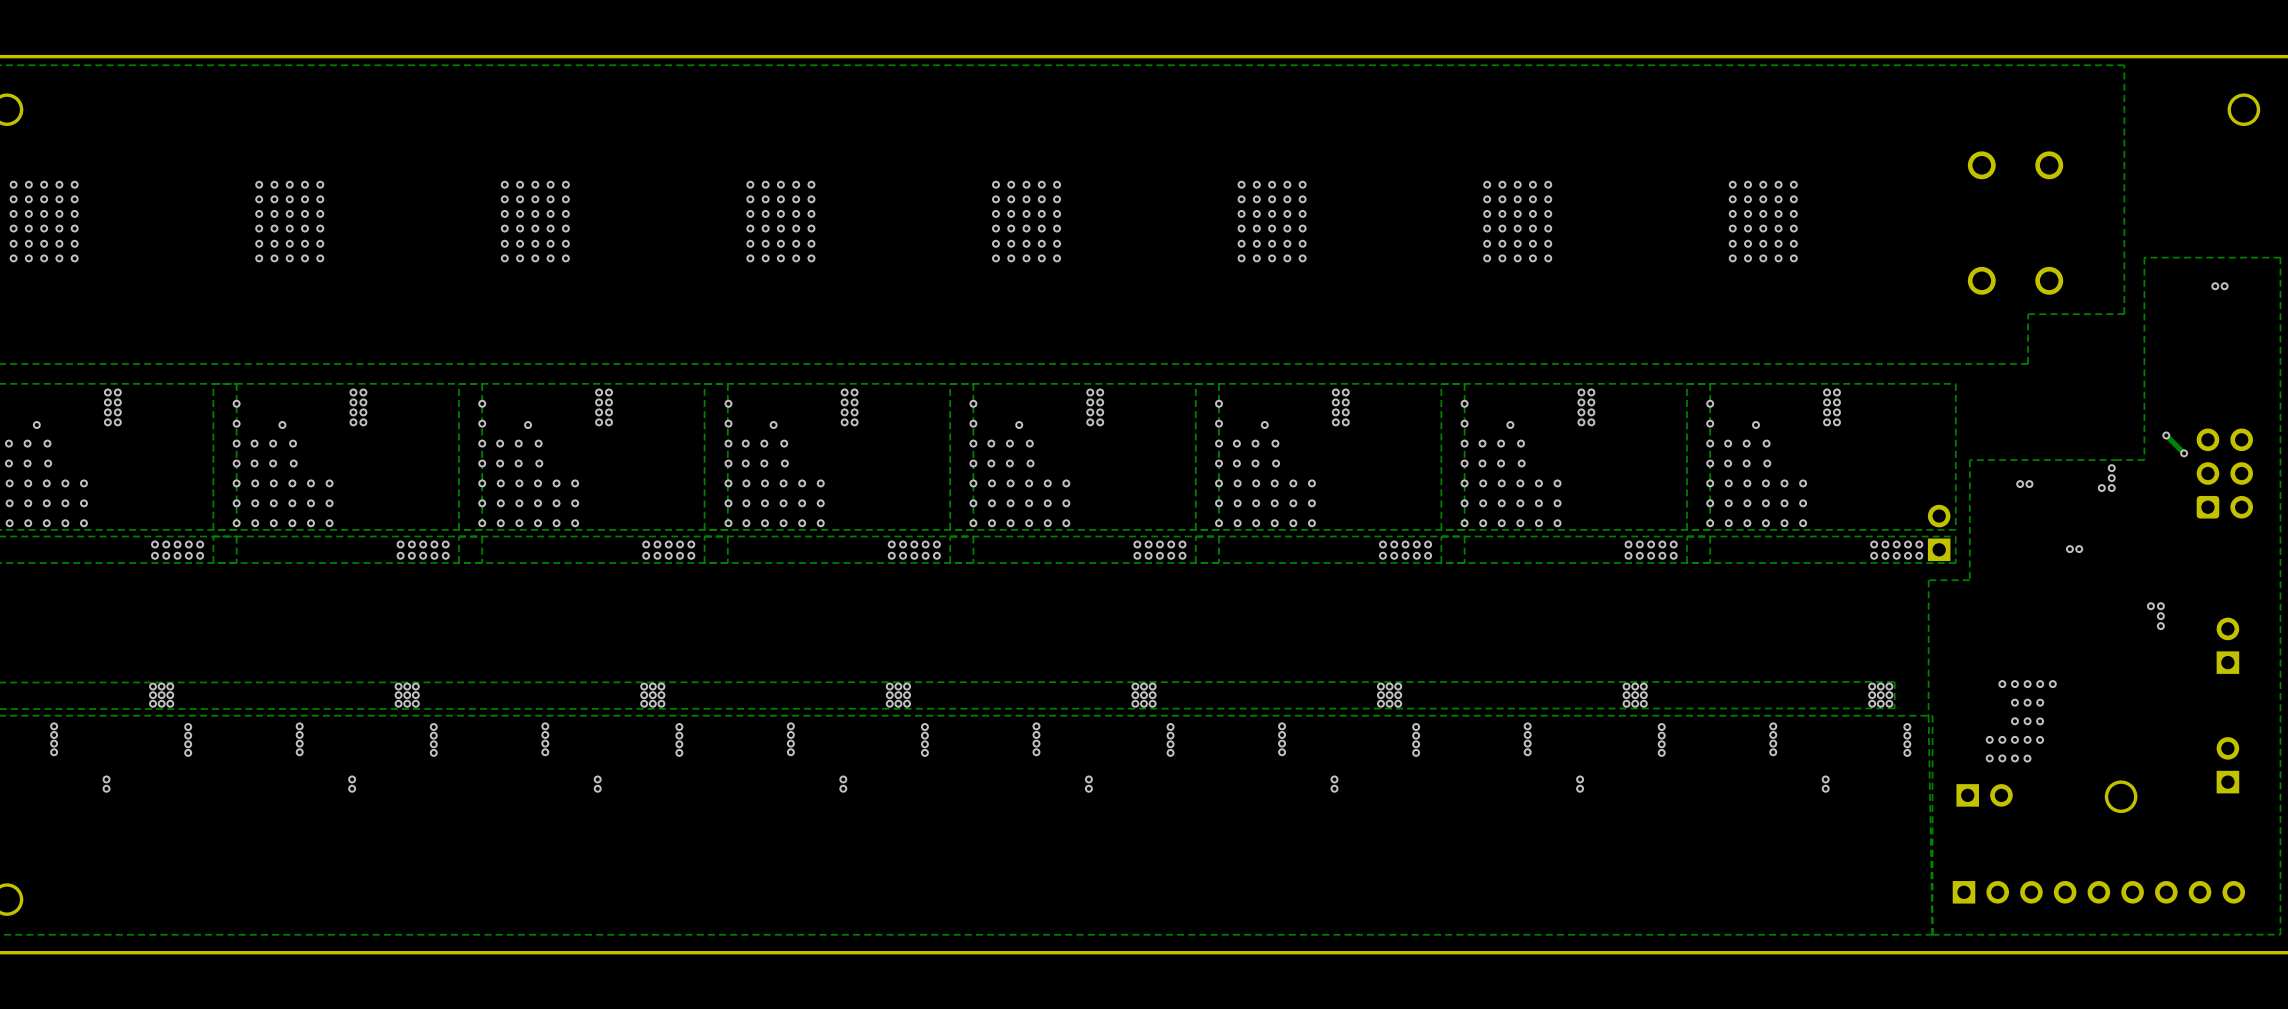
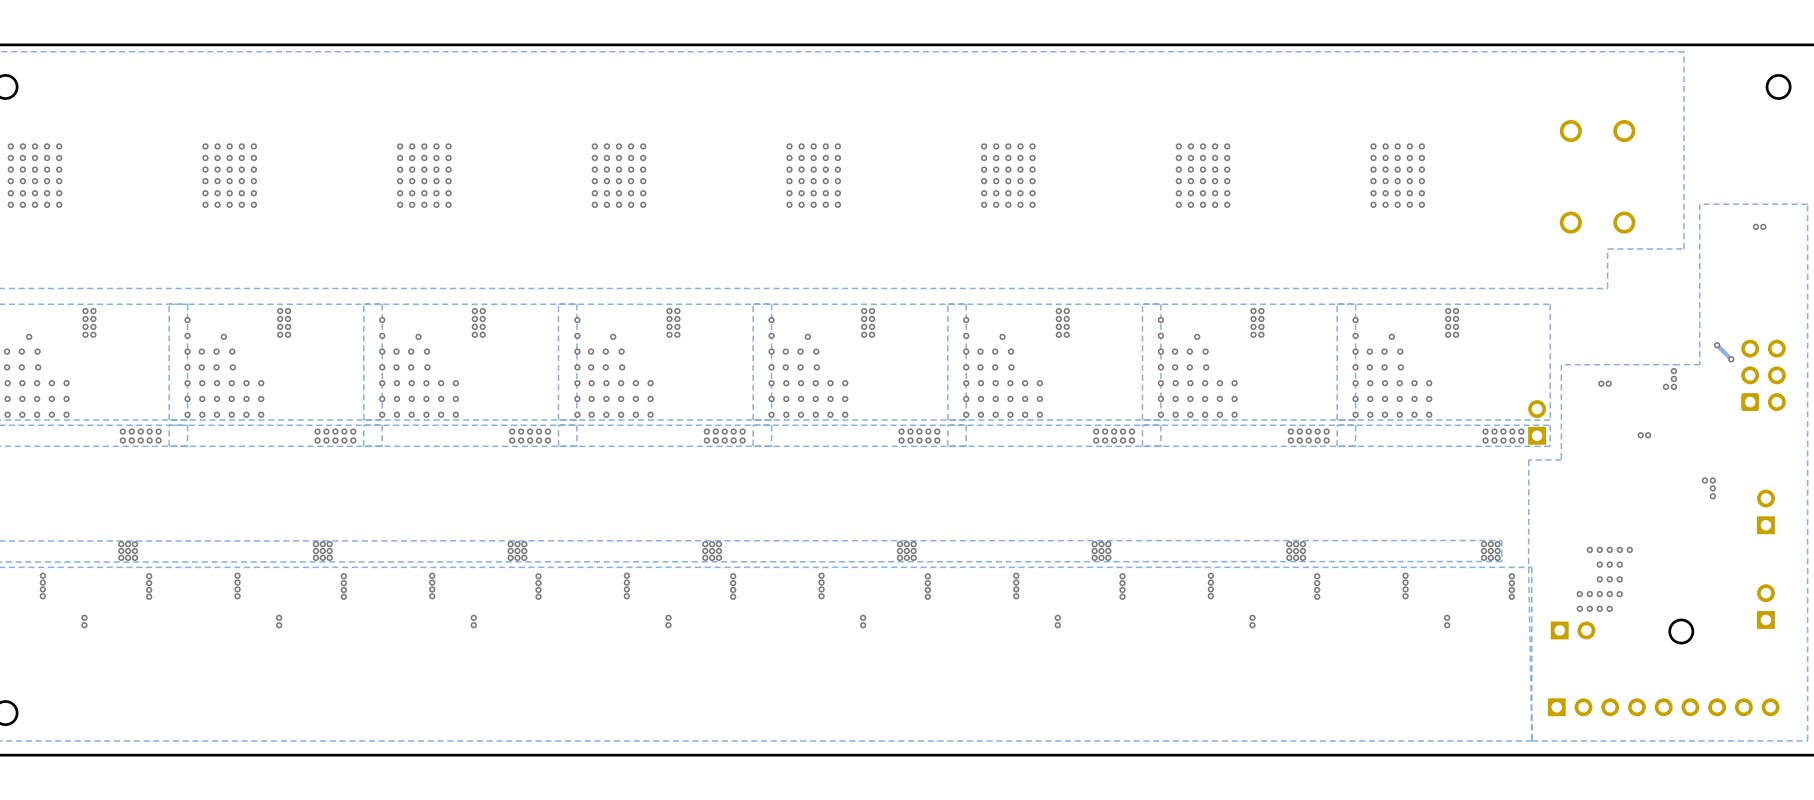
via: (2002, 684) -> none
via: (2014, 684) -> none
via: (2027, 684) -> none
via: (2040, 684) -> none
via: (2052, 684) -> none
via: none -> (1589, 549)
via: none -> (1599, 549)
via: none -> (1609, 549)
via: none -> (1619, 549)
via: none -> (1629, 549)
via: (2014, 702) -> none
via: (2027, 702) -> none
via: (2040, 702) -> none
via: none -> (1599, 564)
via: none -> (1609, 564)
via: none -> (1619, 564)
via: (2014, 721) -> none
via: (2027, 721) -> none
via: (2040, 721) -> none
via: none -> (1599, 579)
via: none -> (1609, 579)
via: none -> (1619, 579)
via: (1989, 739) -> none
via: (2002, 739) -> none
via: (2014, 739) -> none
via: (2027, 739) -> none
via: (2040, 739) -> none
via: none -> (1579, 594)
via: none -> (1589, 594)
via: none -> (1599, 594)
via: none -> (1609, 594)
via: none -> (1619, 594)
via: (1989, 758) -> none
via: (2002, 758) -> none
via: (2014, 758) -> none
via: (2027, 758) -> none
via: none -> (1579, 608)
via: none -> (1589, 608)
via: none -> (1599, 608)
via: none -> (1609, 608)

